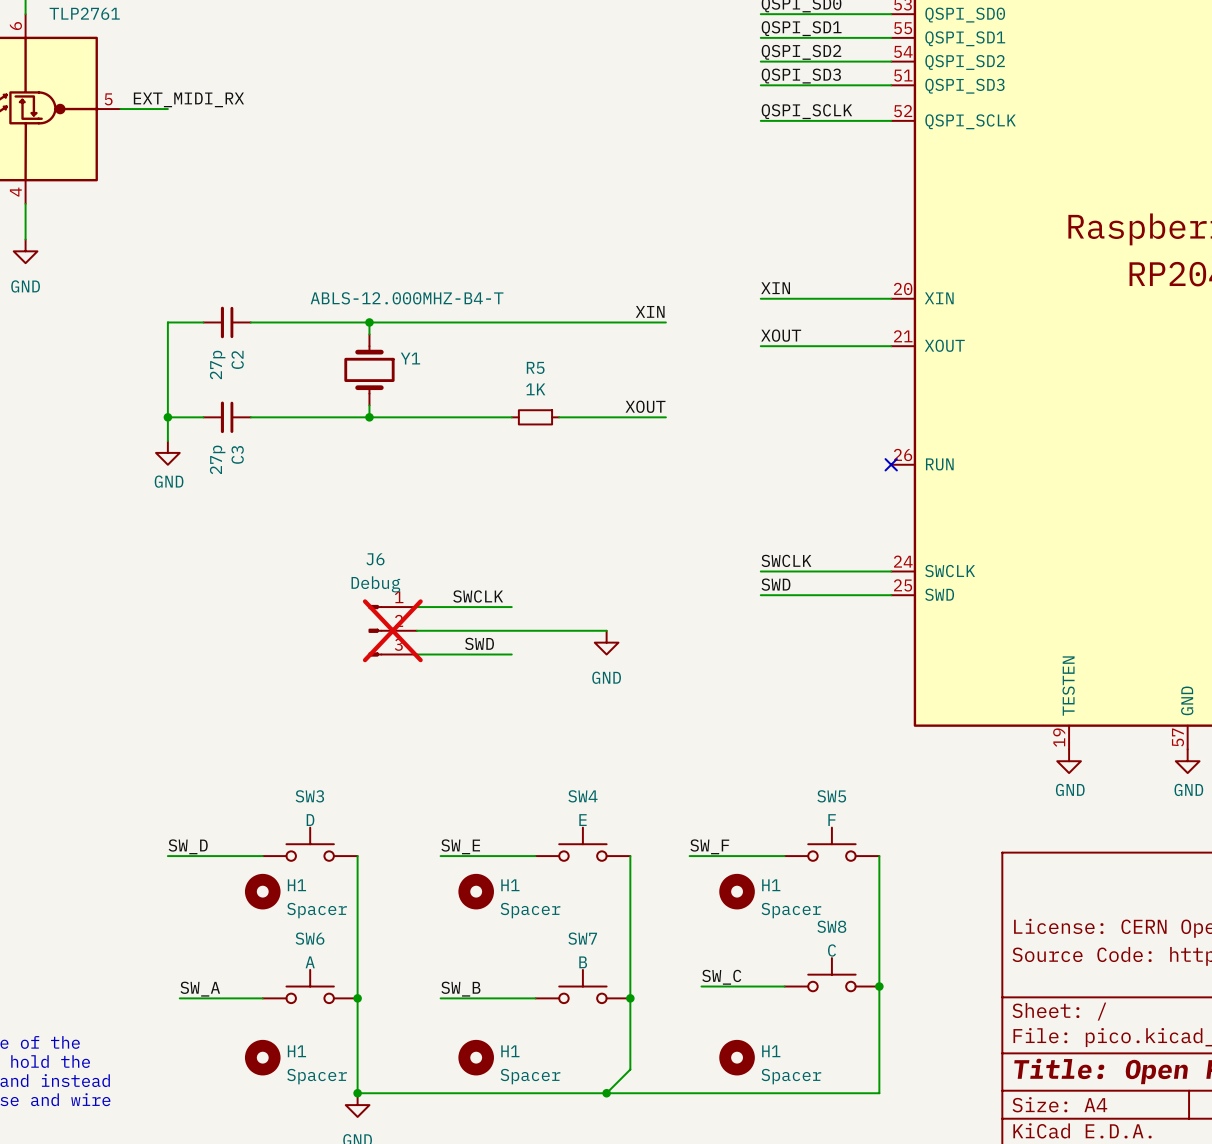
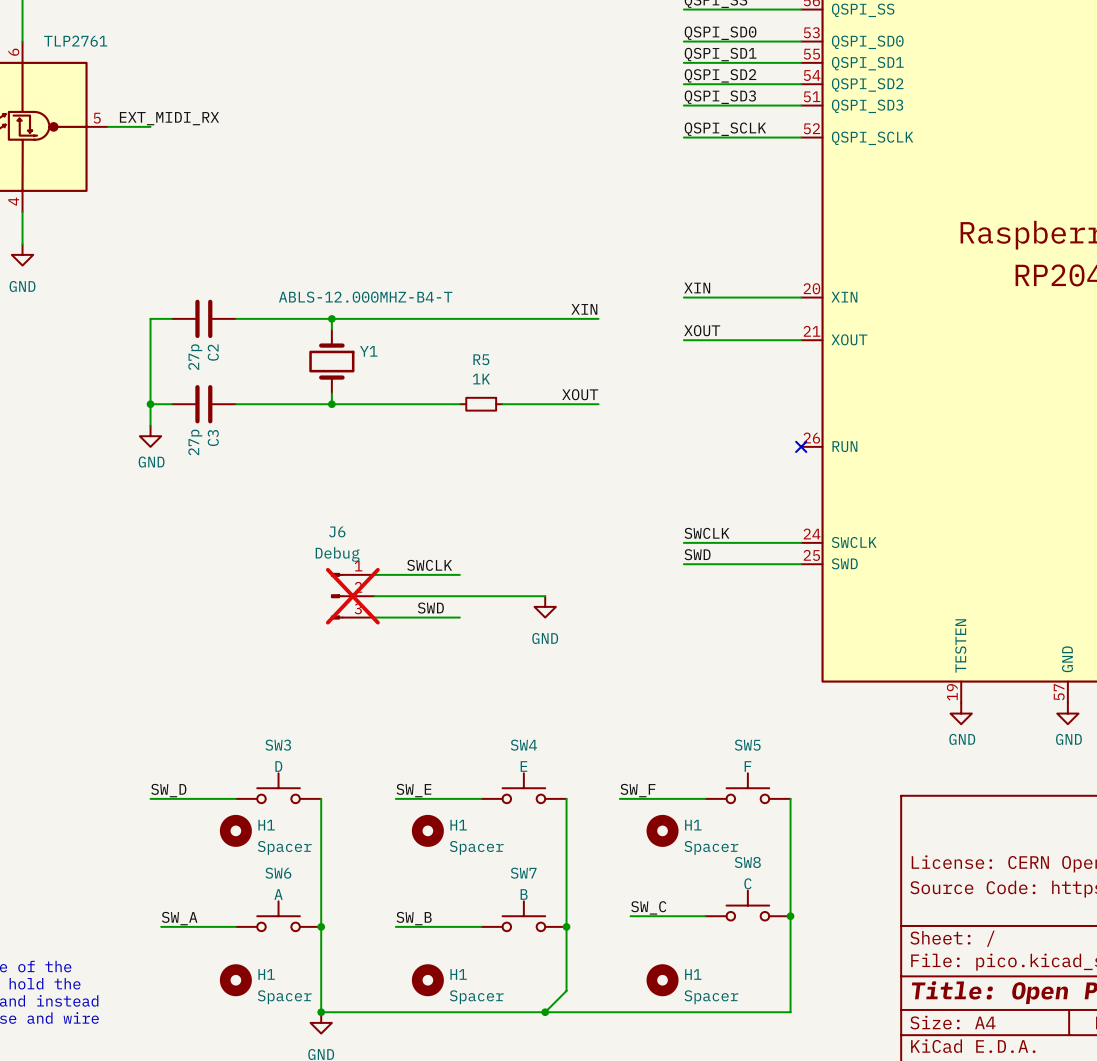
C2 symbol: [203, 306, 251, 339] -> [171, 299, 236, 339]
C3 symbol: [203, 401, 251, 434] -> [171, 385, 236, 424]

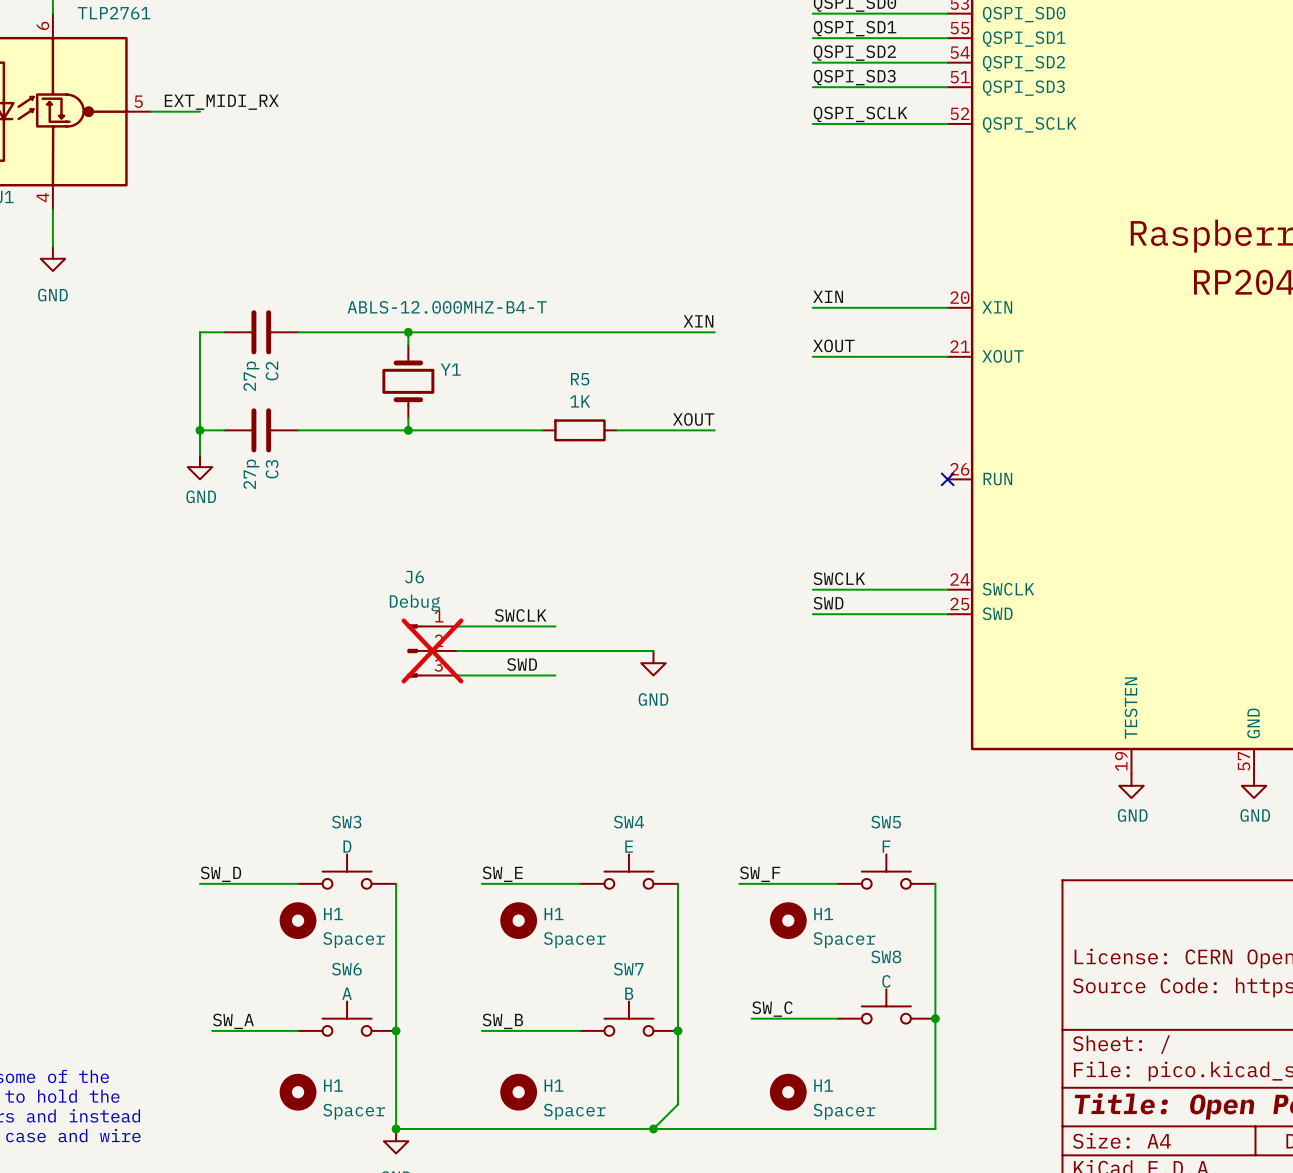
R5 symbol: [459, 396, 503, 412] -> [543, 419, 617, 442]

